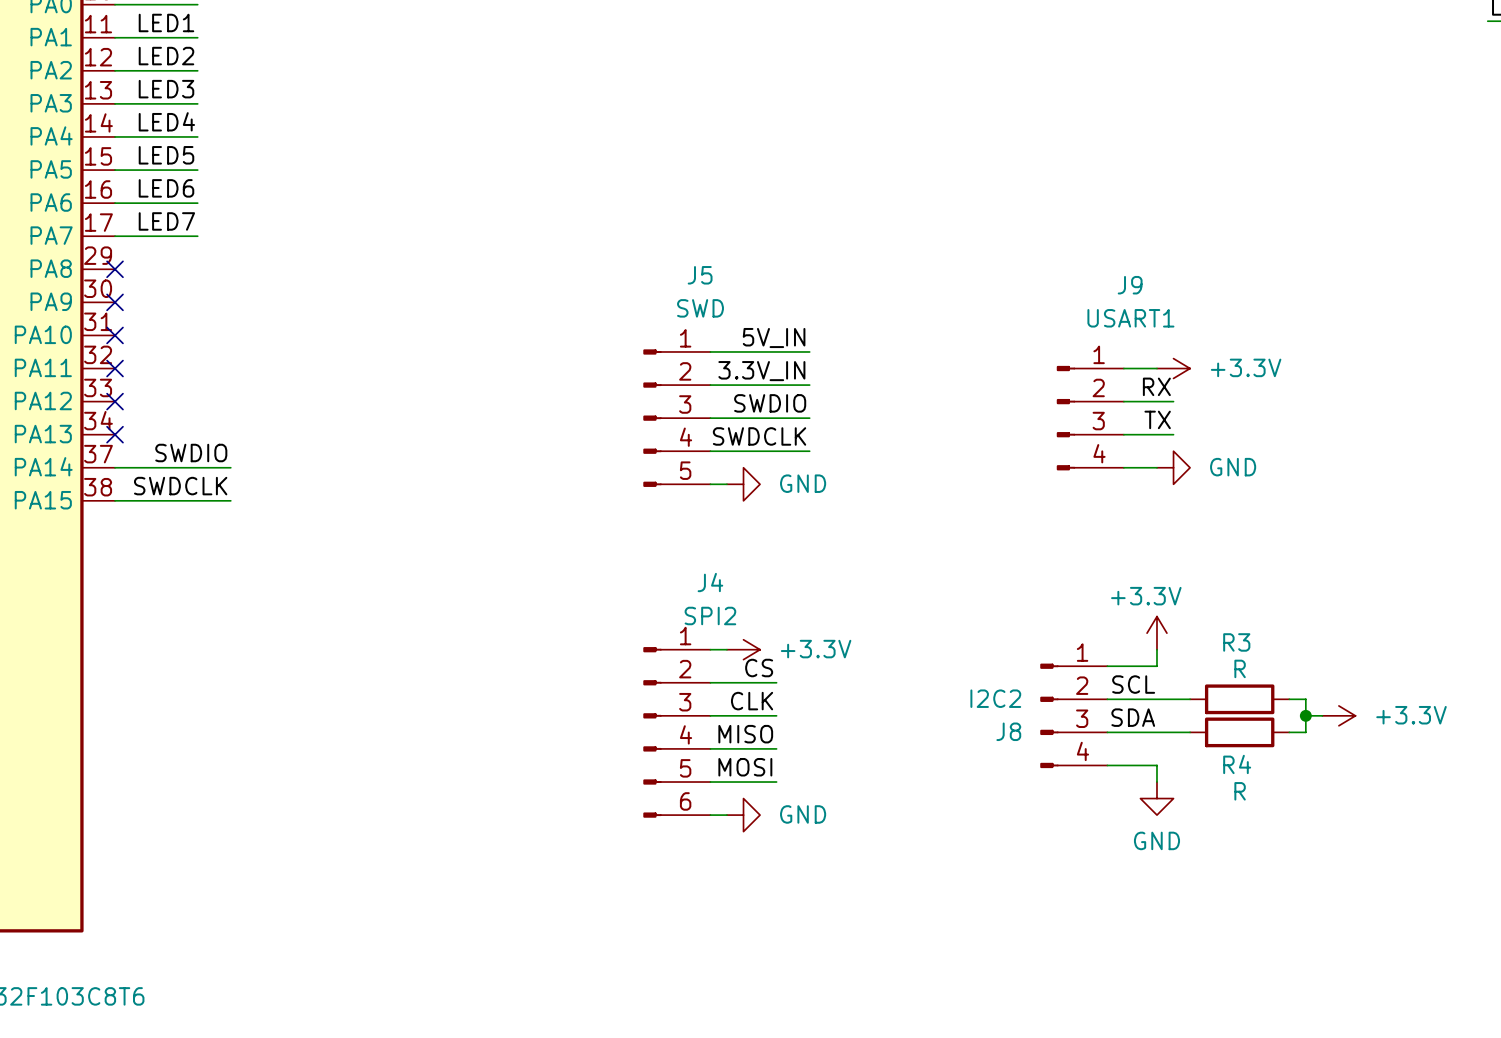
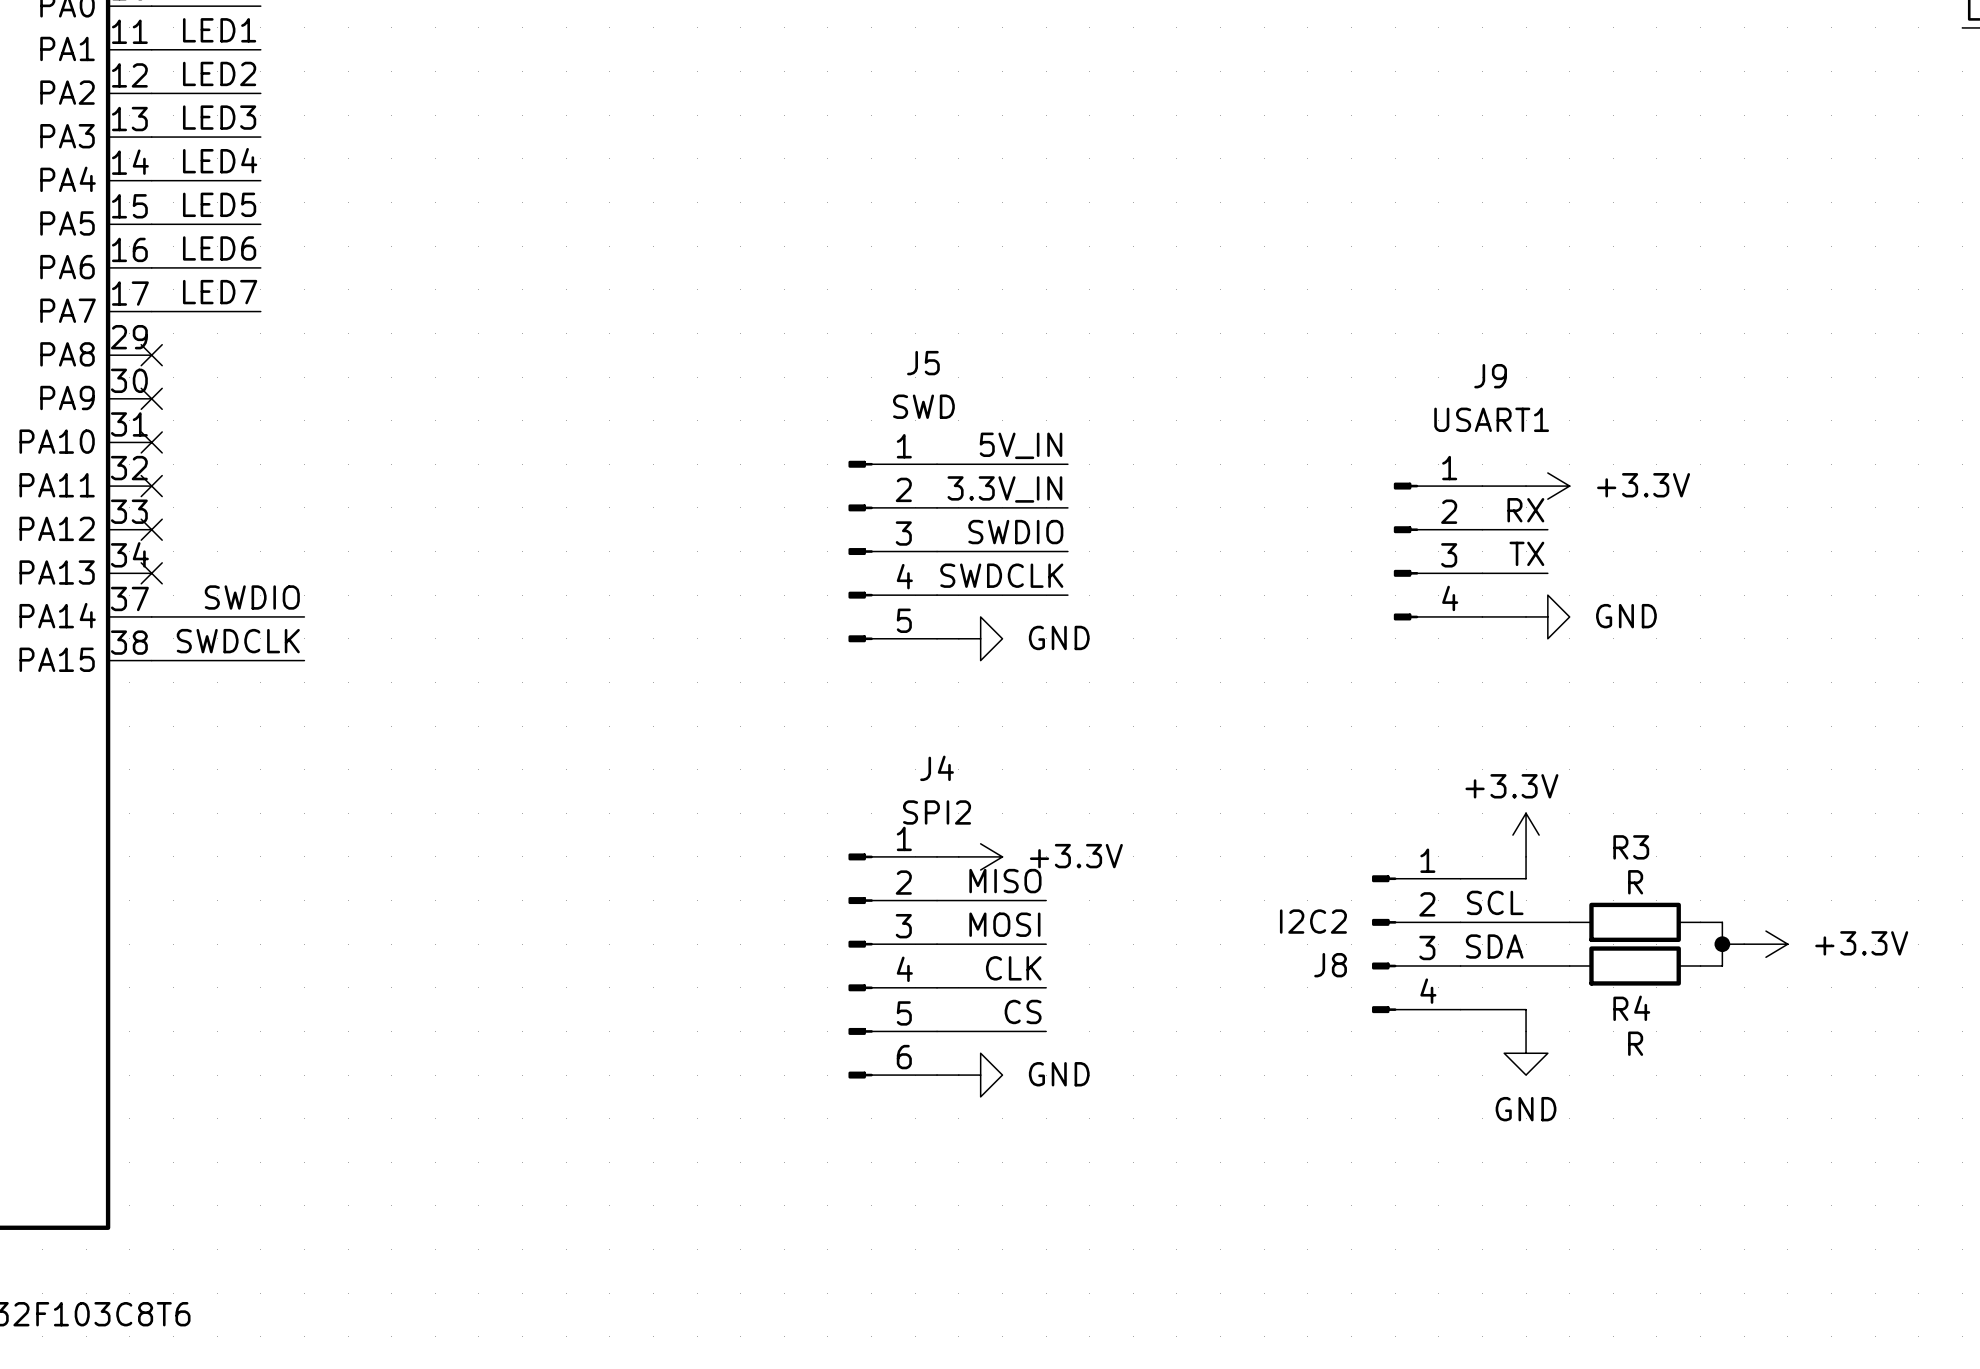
label position: CS (759, 668) -> CS (1023, 1011)
wire: none -> (1024, 900) (1046, 900)
label position: CLK (752, 701) -> CLK (1013, 968)
wire: none -> (1024, 944) (1046, 944)
label position: MISO (745, 734) -> MISO (1005, 881)
wire: none -> (1024, 987) (1046, 987)
label position: MOSI (745, 767) -> MOSI (1004, 924)
wire: none -> (1024, 1031) (1046, 1031)

